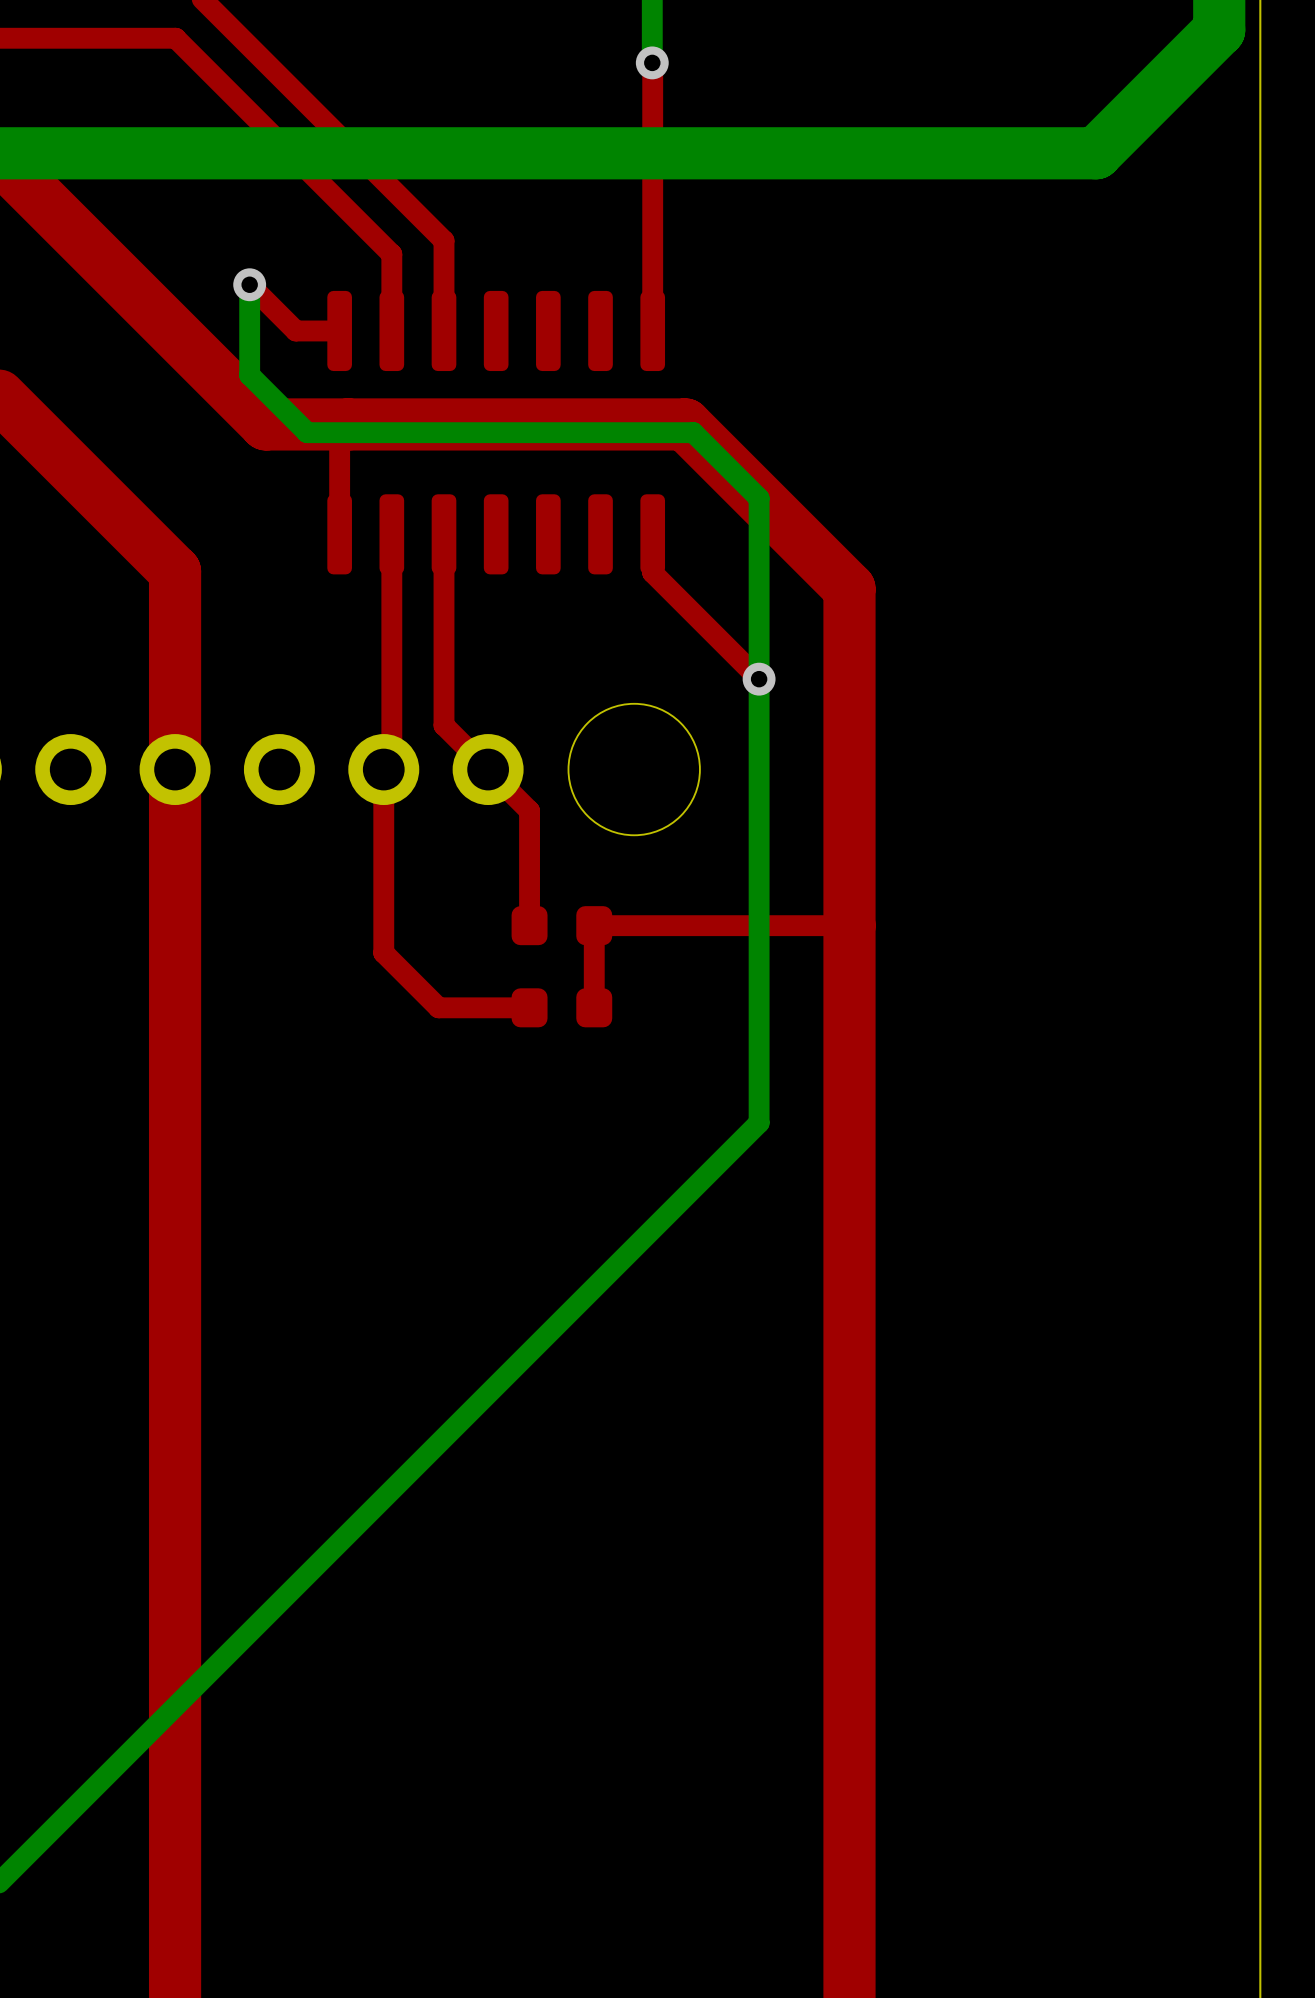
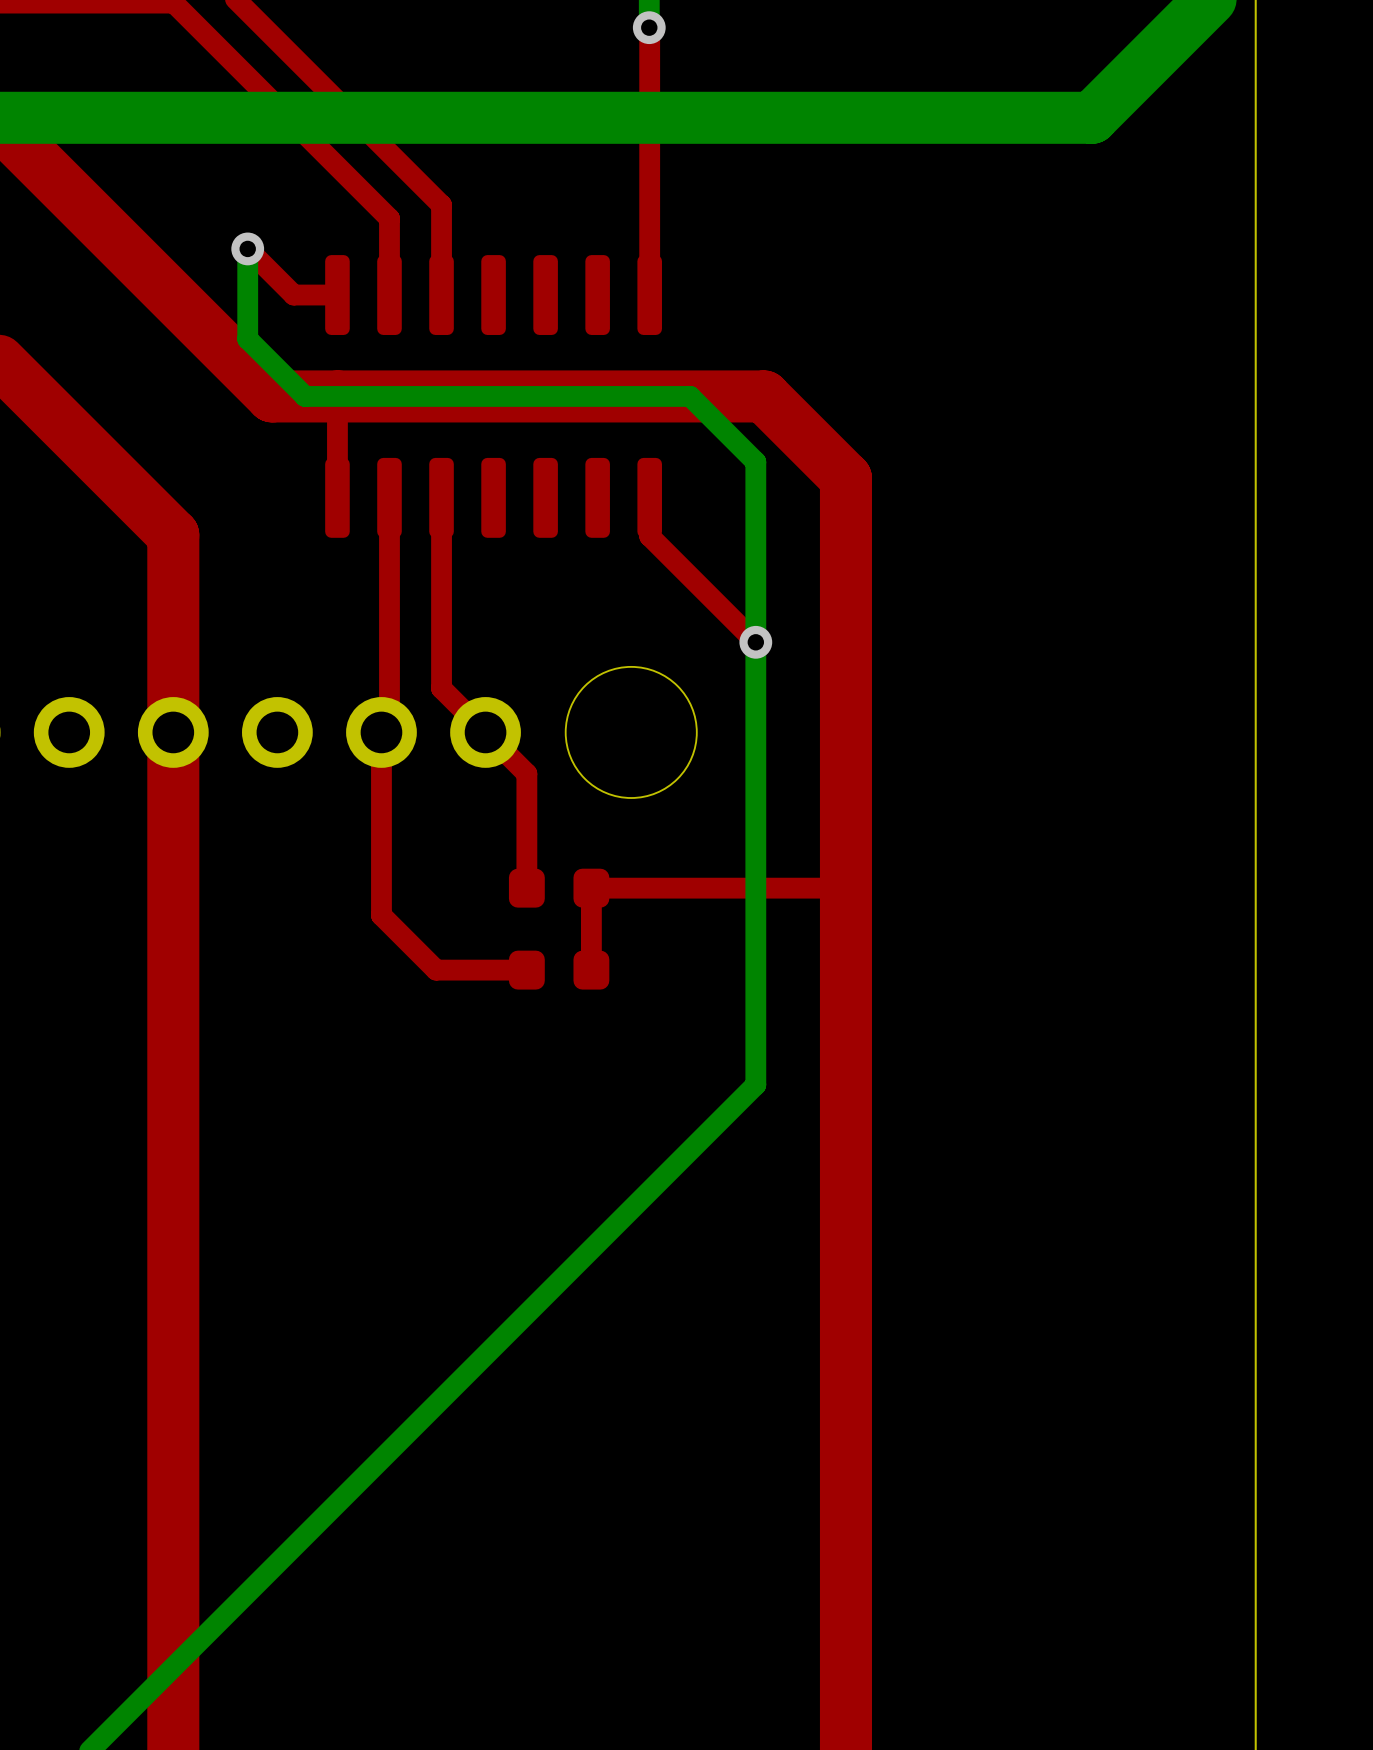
top track: (266, 424) (685, 424) (849, 588) -> (264, 388) (272, 396) (764, 396) (845, 478) (845, 552)

